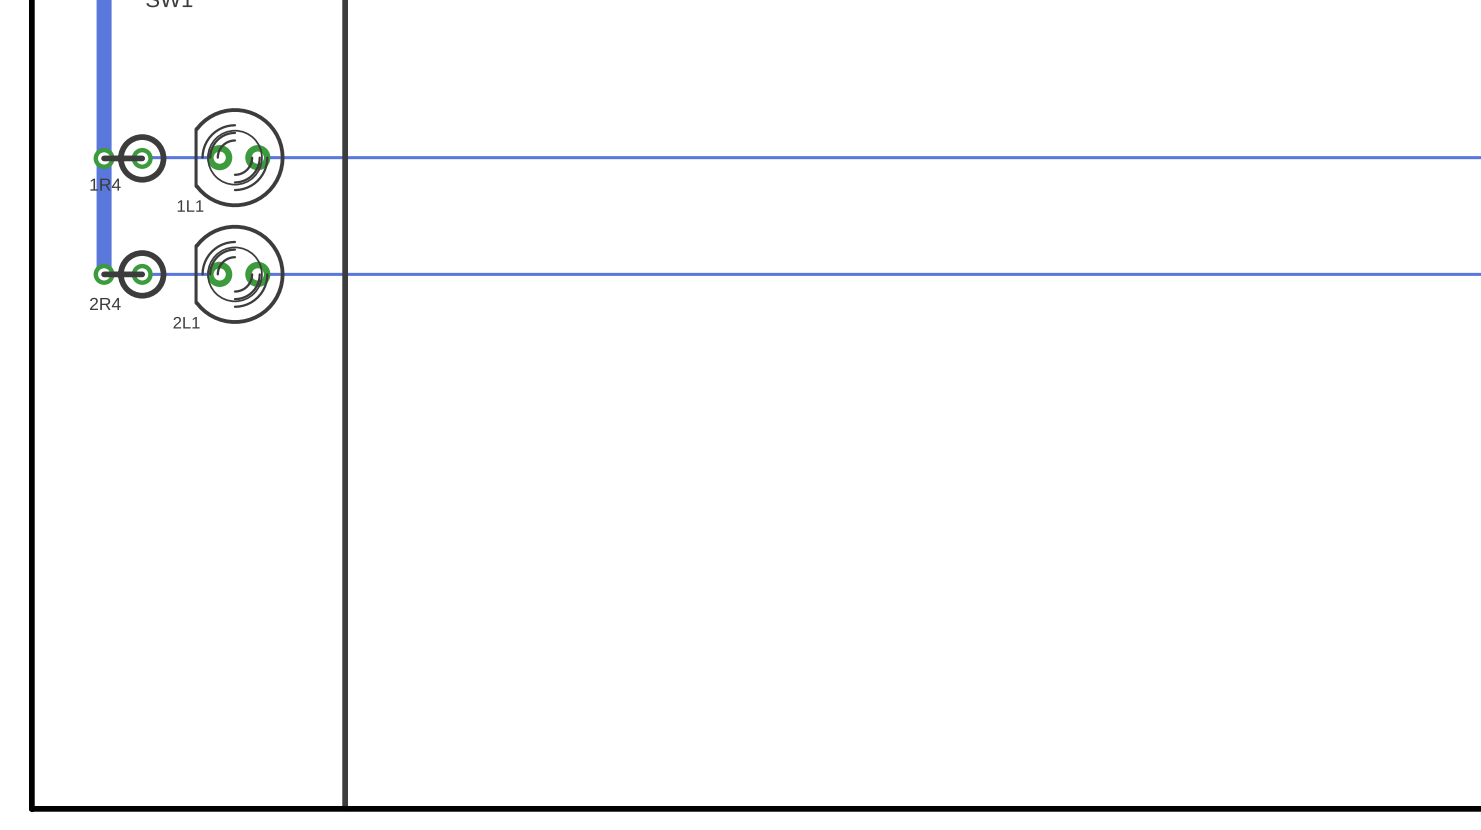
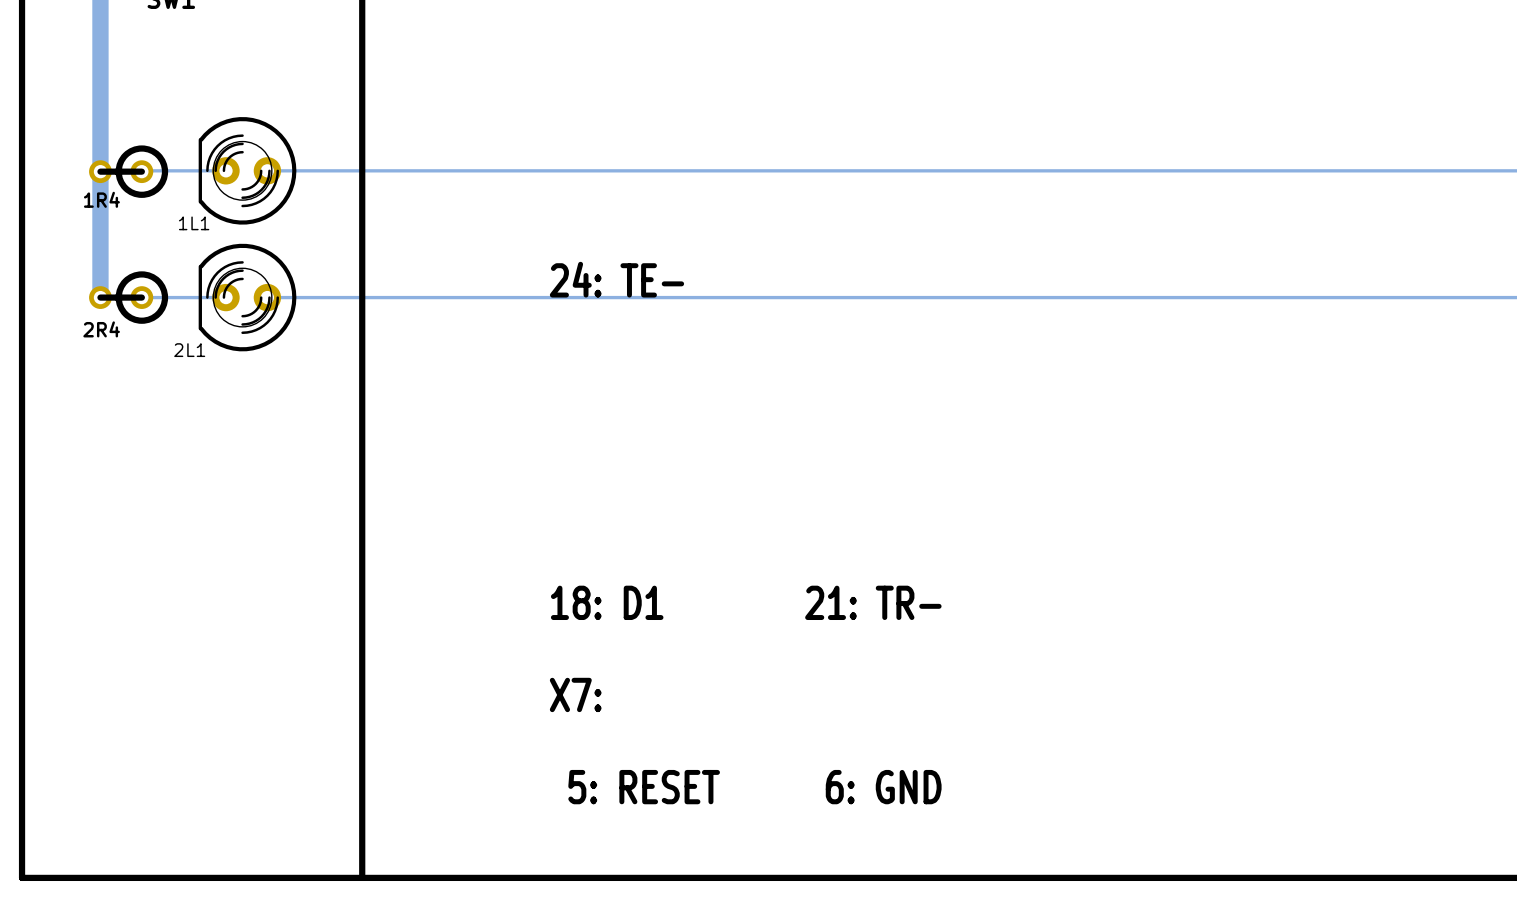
text: none -> 24: TE- (616, 279)
text: none -> 18: D1 21: TR- (746, 602)
text: none -> X7: (575, 694)
text: none -> 5: RESET 6: GND (754, 787)

